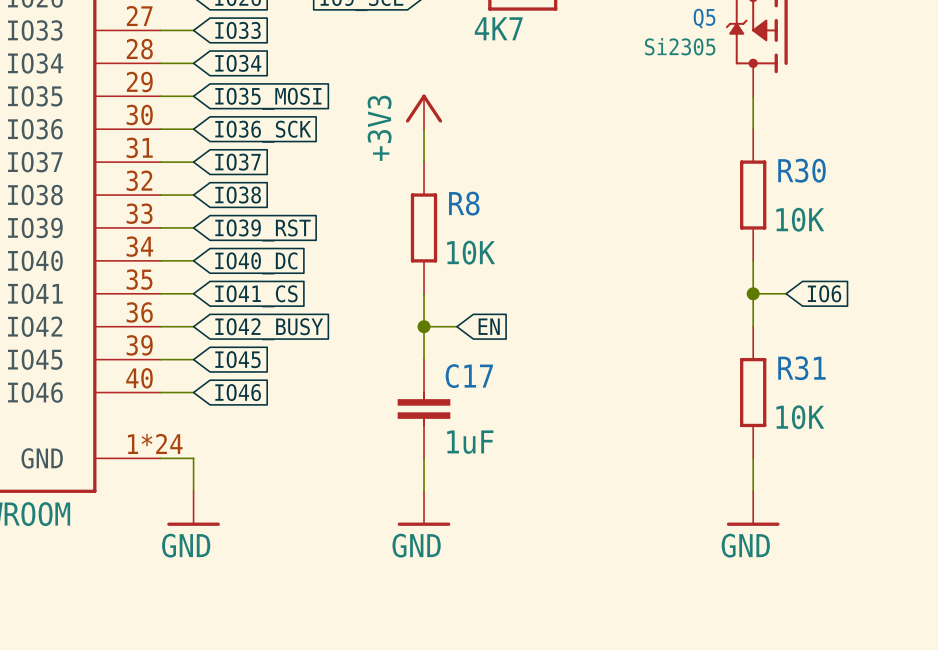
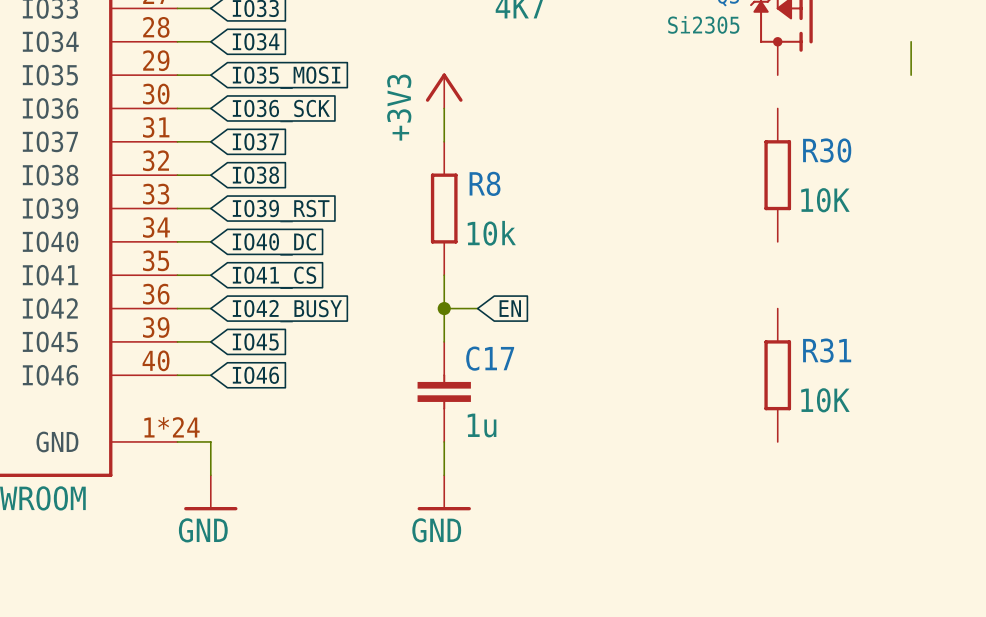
wire: (753, 96) (753, 129) -> (911, 41) (911, 75)
R8 value: 10K (471, 252) -> 10k (491, 233)
wire: (753, 260) (753, 326) -> none
wire: (753, 293) (786, 293) -> none
junction: (753, 293) -> none
global label: IO6 (824, 293) -> none
C17 value: 1uF (470, 442) -> 1u (482, 425)
wire: (753, 458) (753, 491) -> none
power symbol: GND (753, 508) -> none

